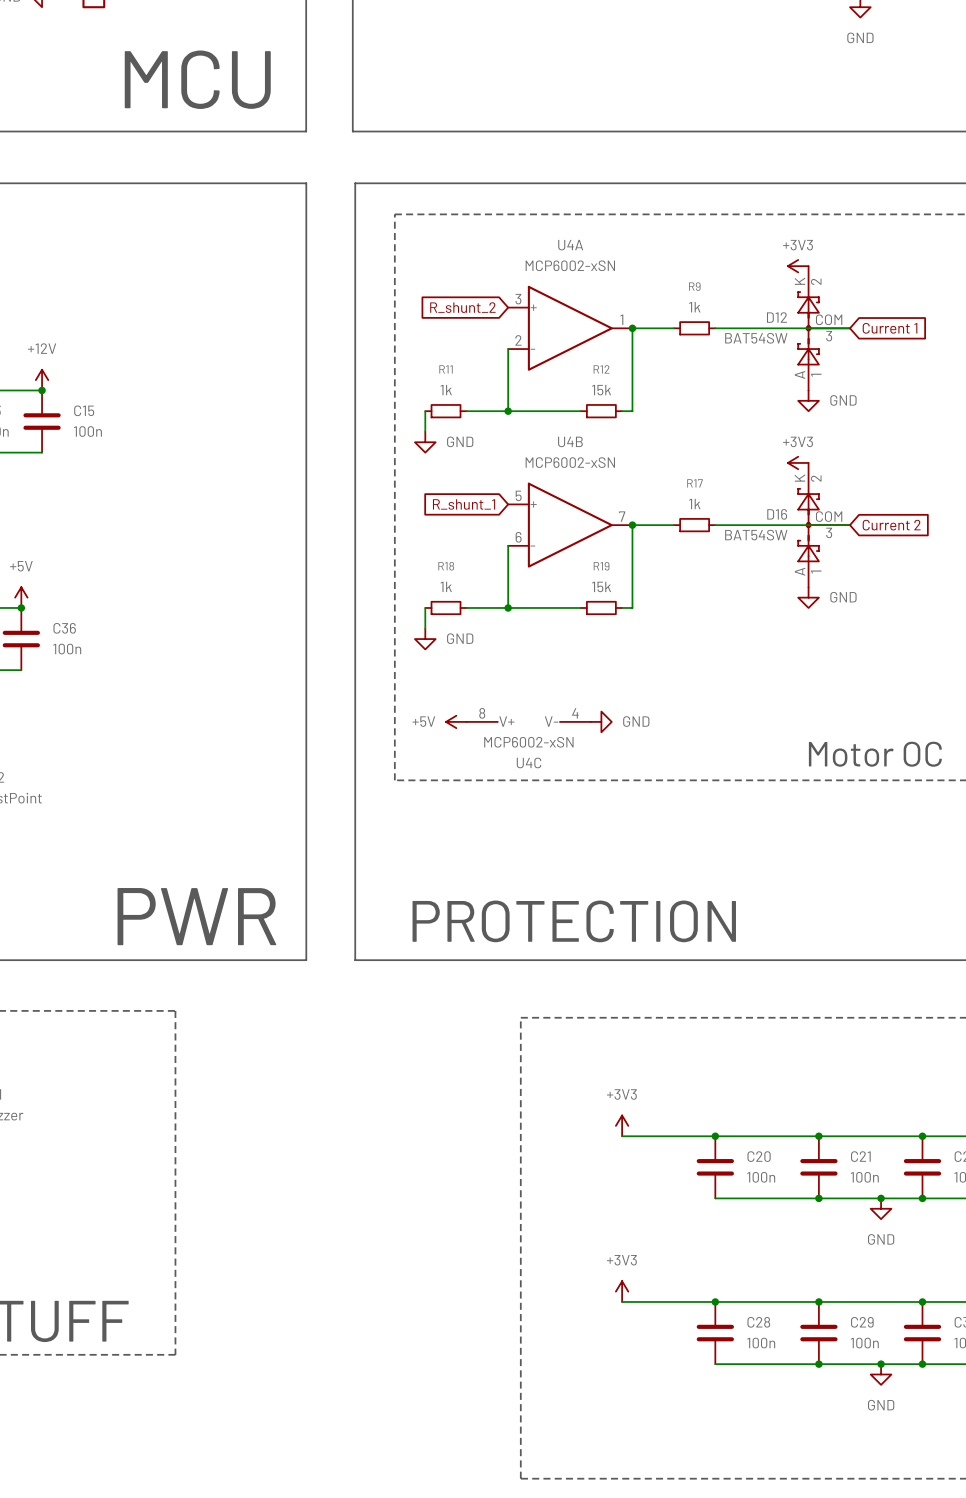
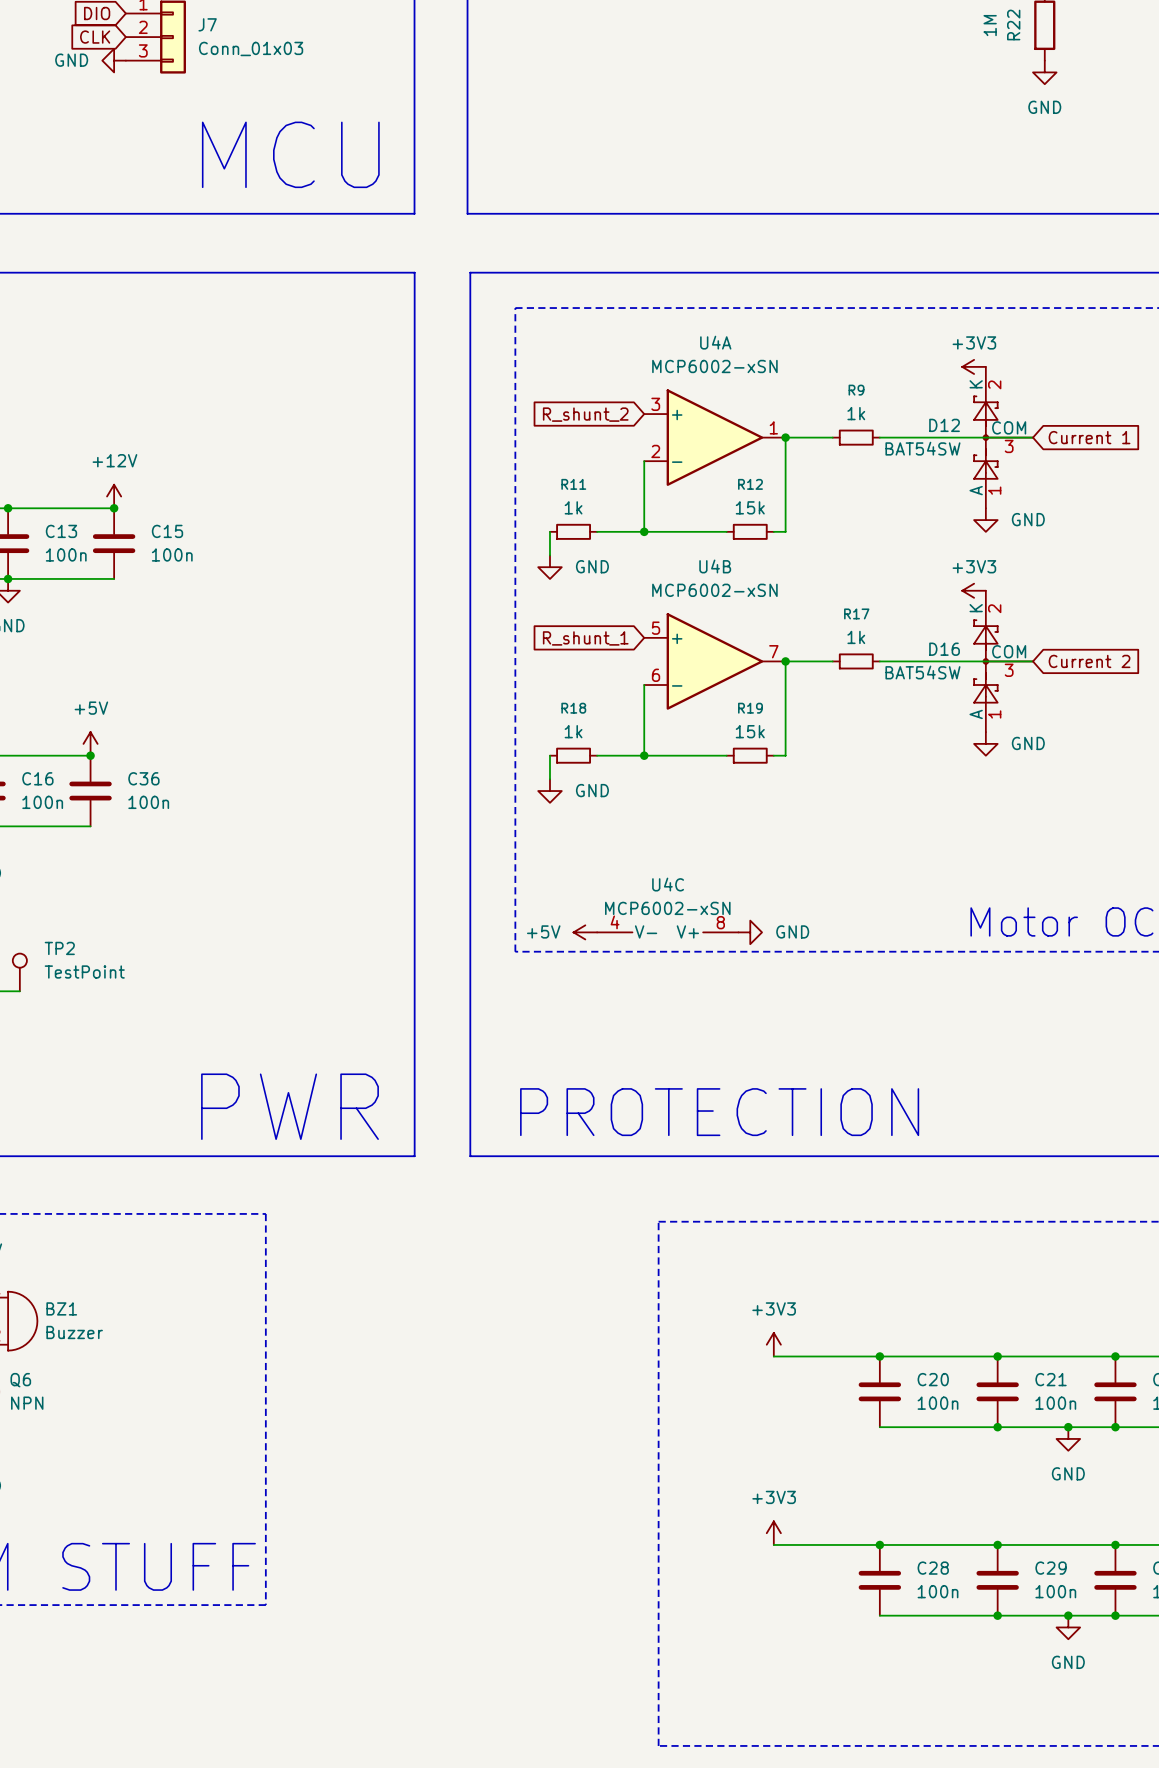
power symbol position: +5V (456, 721) -> +5V (585, 932)
U4C rotation: 0° (528, 721) -> 180° (667, 932)
power symbol position: GND (601, 721) -> GND (750, 932)

